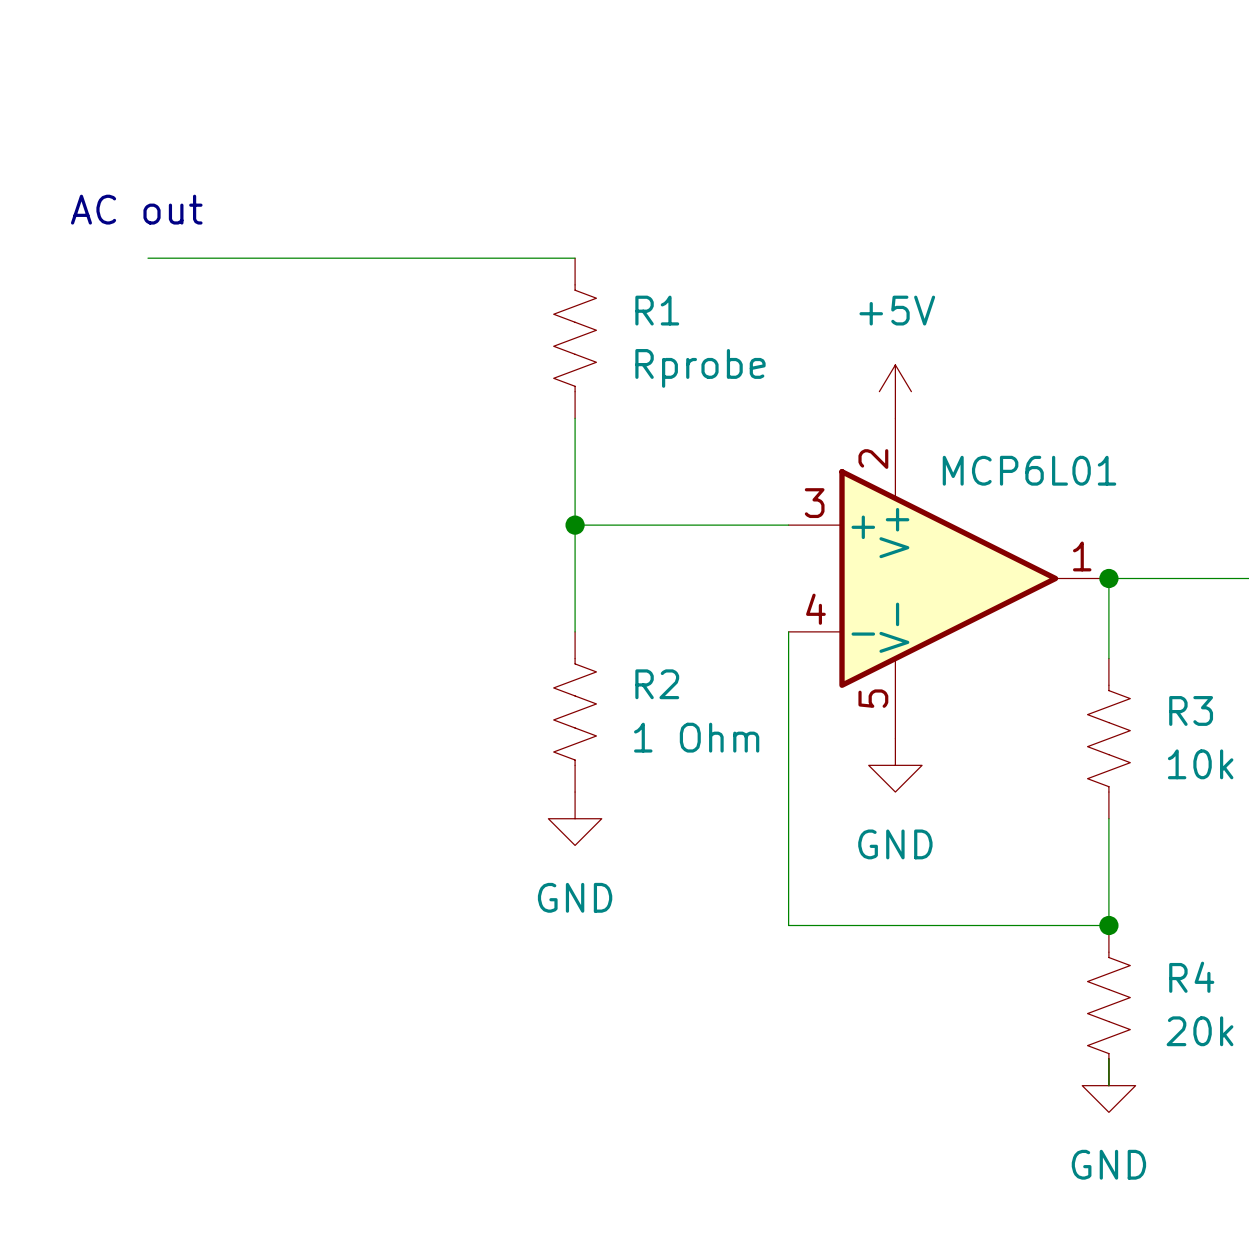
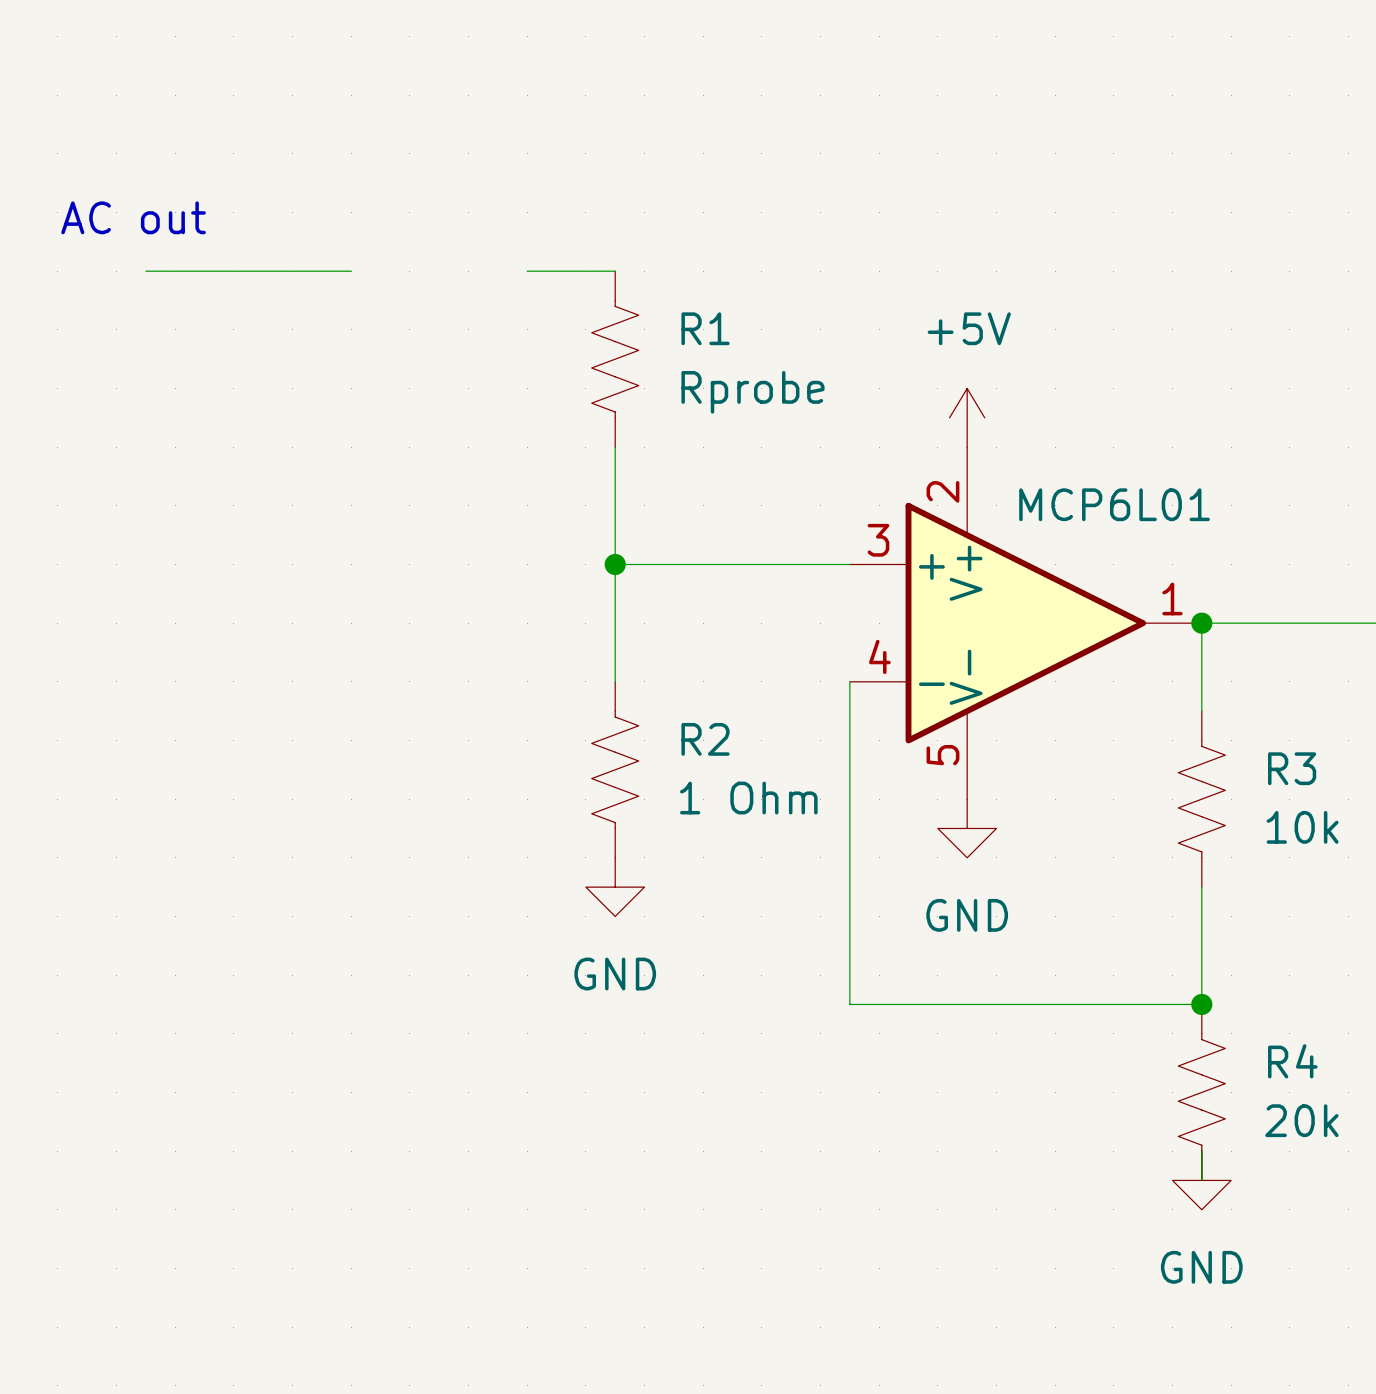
wire: (334, 258) (495, 258) -> none

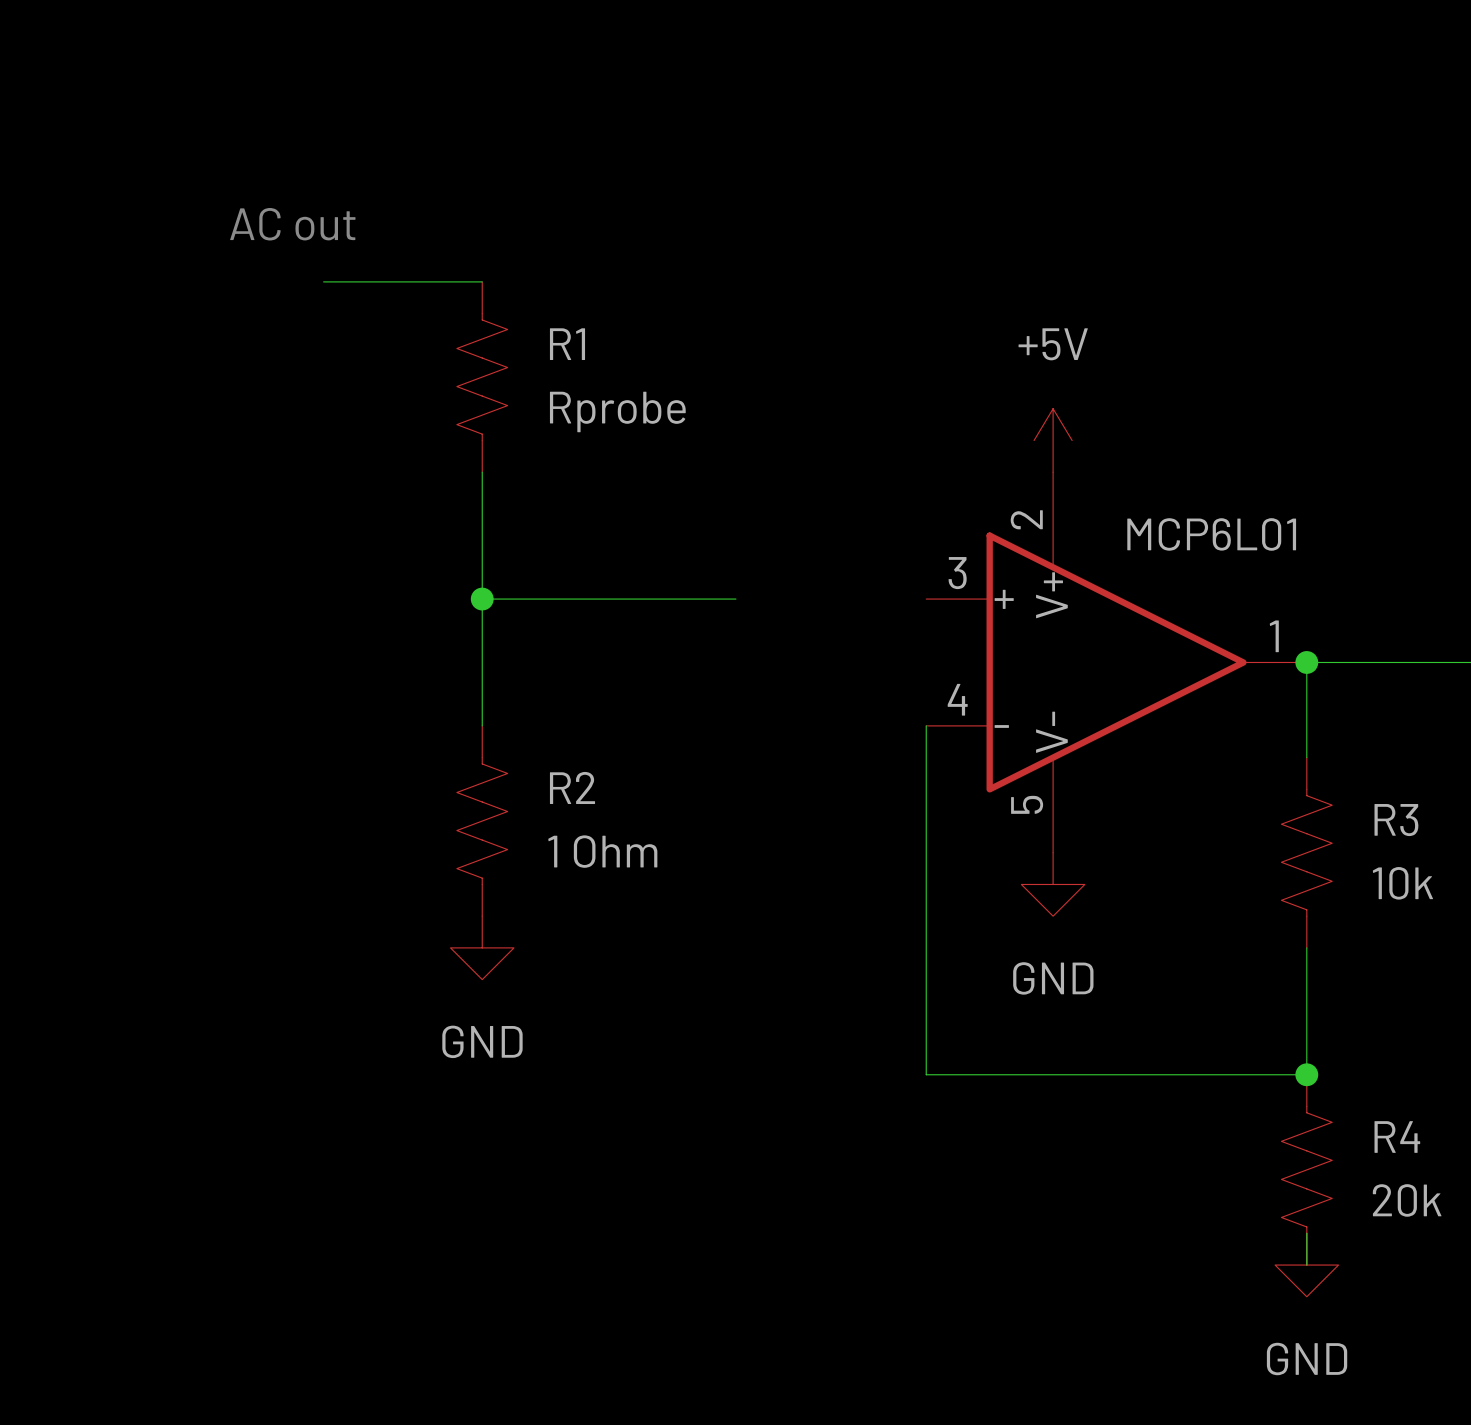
text position: AC out (133, 217) -> AC out (292, 224)
wire: (145, 271) (292, 271) -> none
wire: (527, 271) (615, 271) -> (387, 281) (482, 281)
R1 position: (615, 359) -> (482, 377)
wire: (615, 447) (615, 681) -> (482, 472) (482, 725)
junction: none -> (482, 599)
junction: (615, 564) -> none
wire: (673, 564) (849, 564) -> (482, 599) (672, 599)
R2 position: (615, 769) -> (482, 821)
power symbol position: GND (615, 887) -> GND (482, 947)

